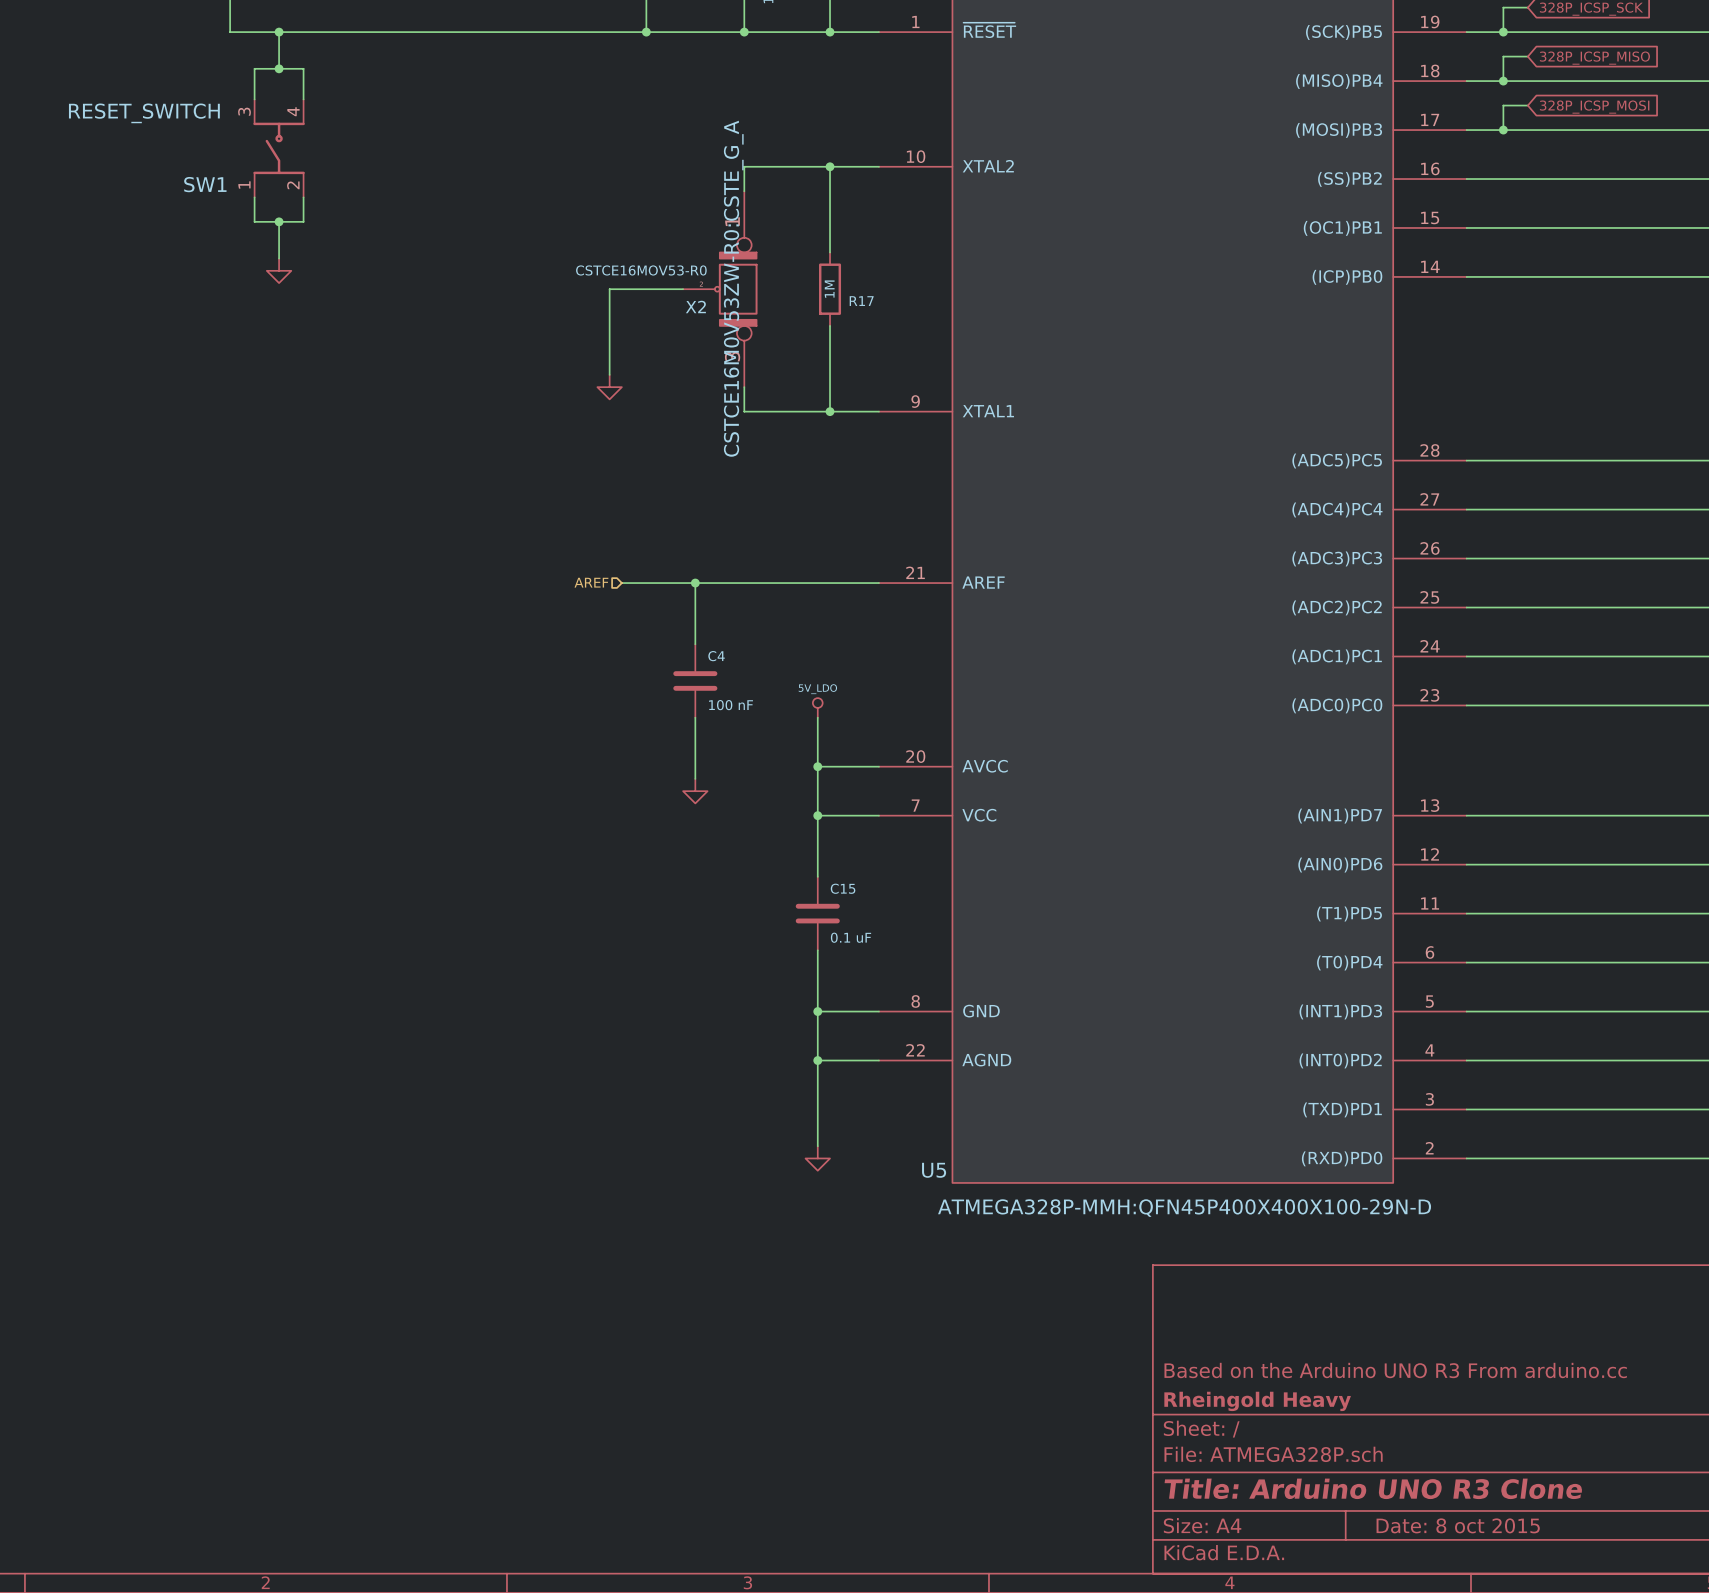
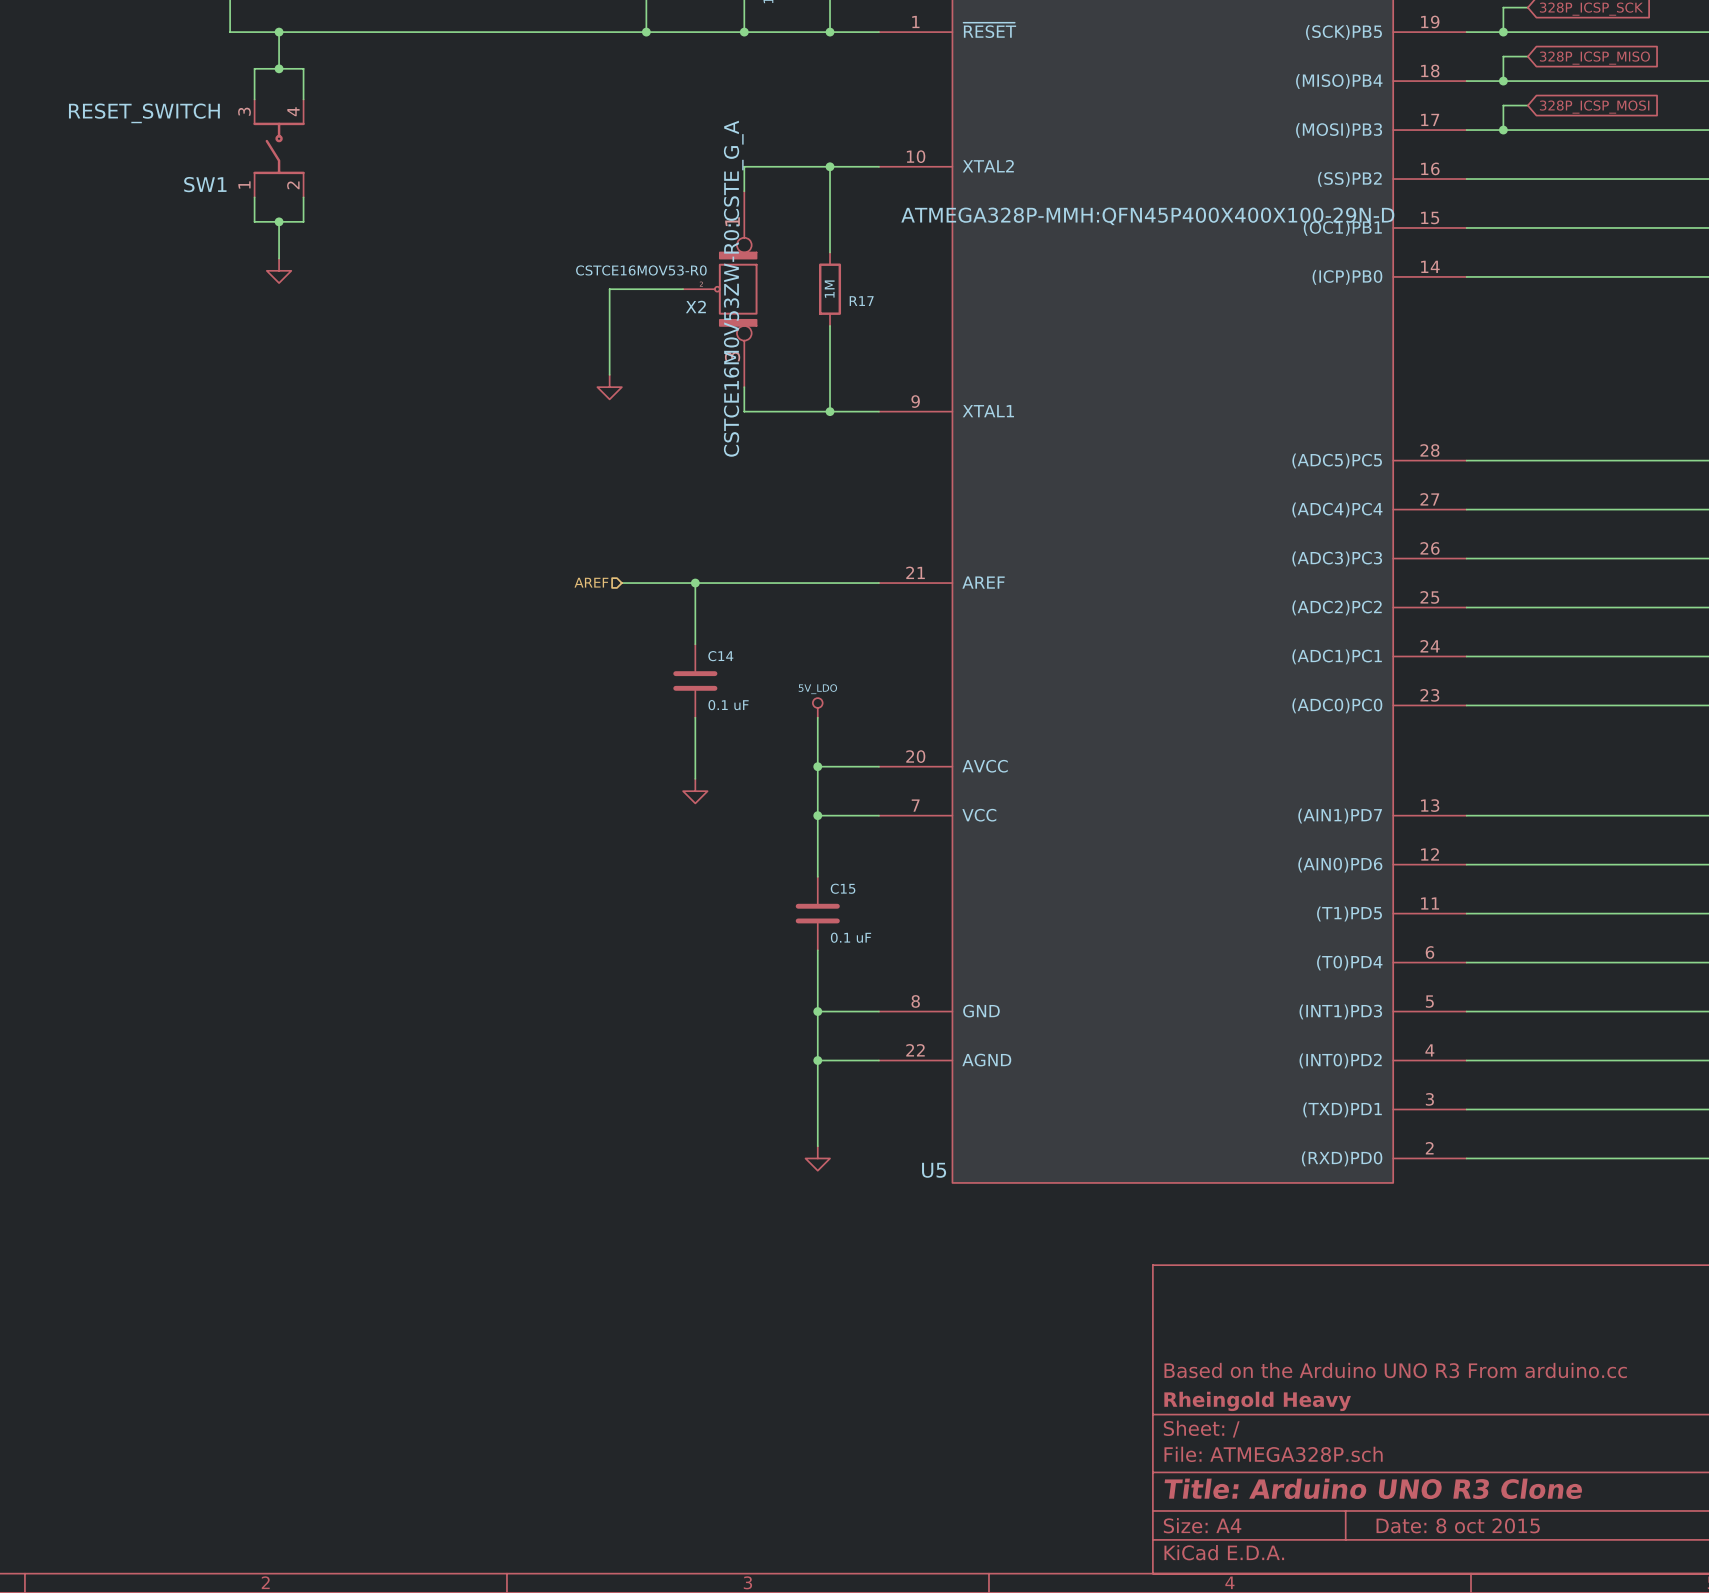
C4 name: C4 (716, 656) -> C14 (720, 656)
C4 value: 100 nF (731, 705) -> 0.1 uF (728, 705)
U5 text position: ATMEGA328P-MMH:QFN45P400X400X100-29N-D (1184, 1208) -> ATMEGA328P-MMH:QFN45P400X400X100-29N-D (1147, 216)

